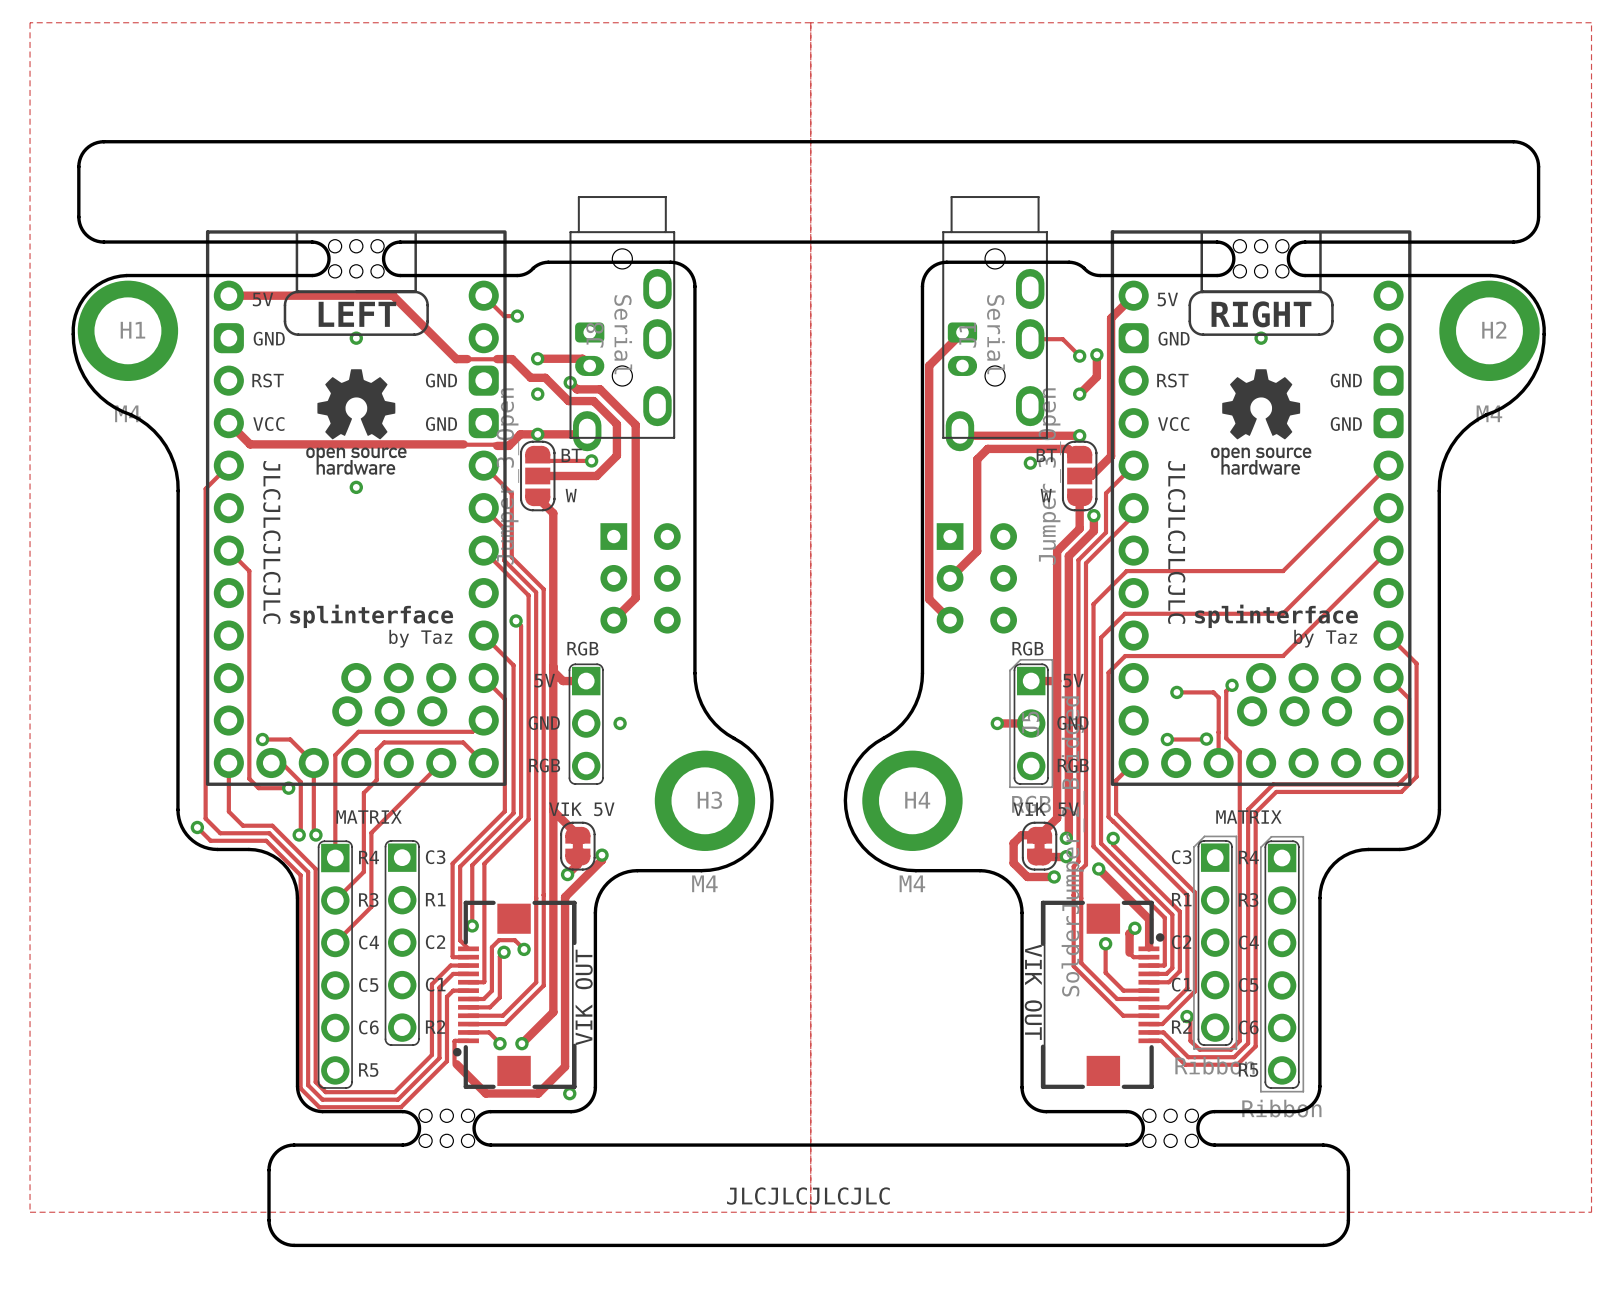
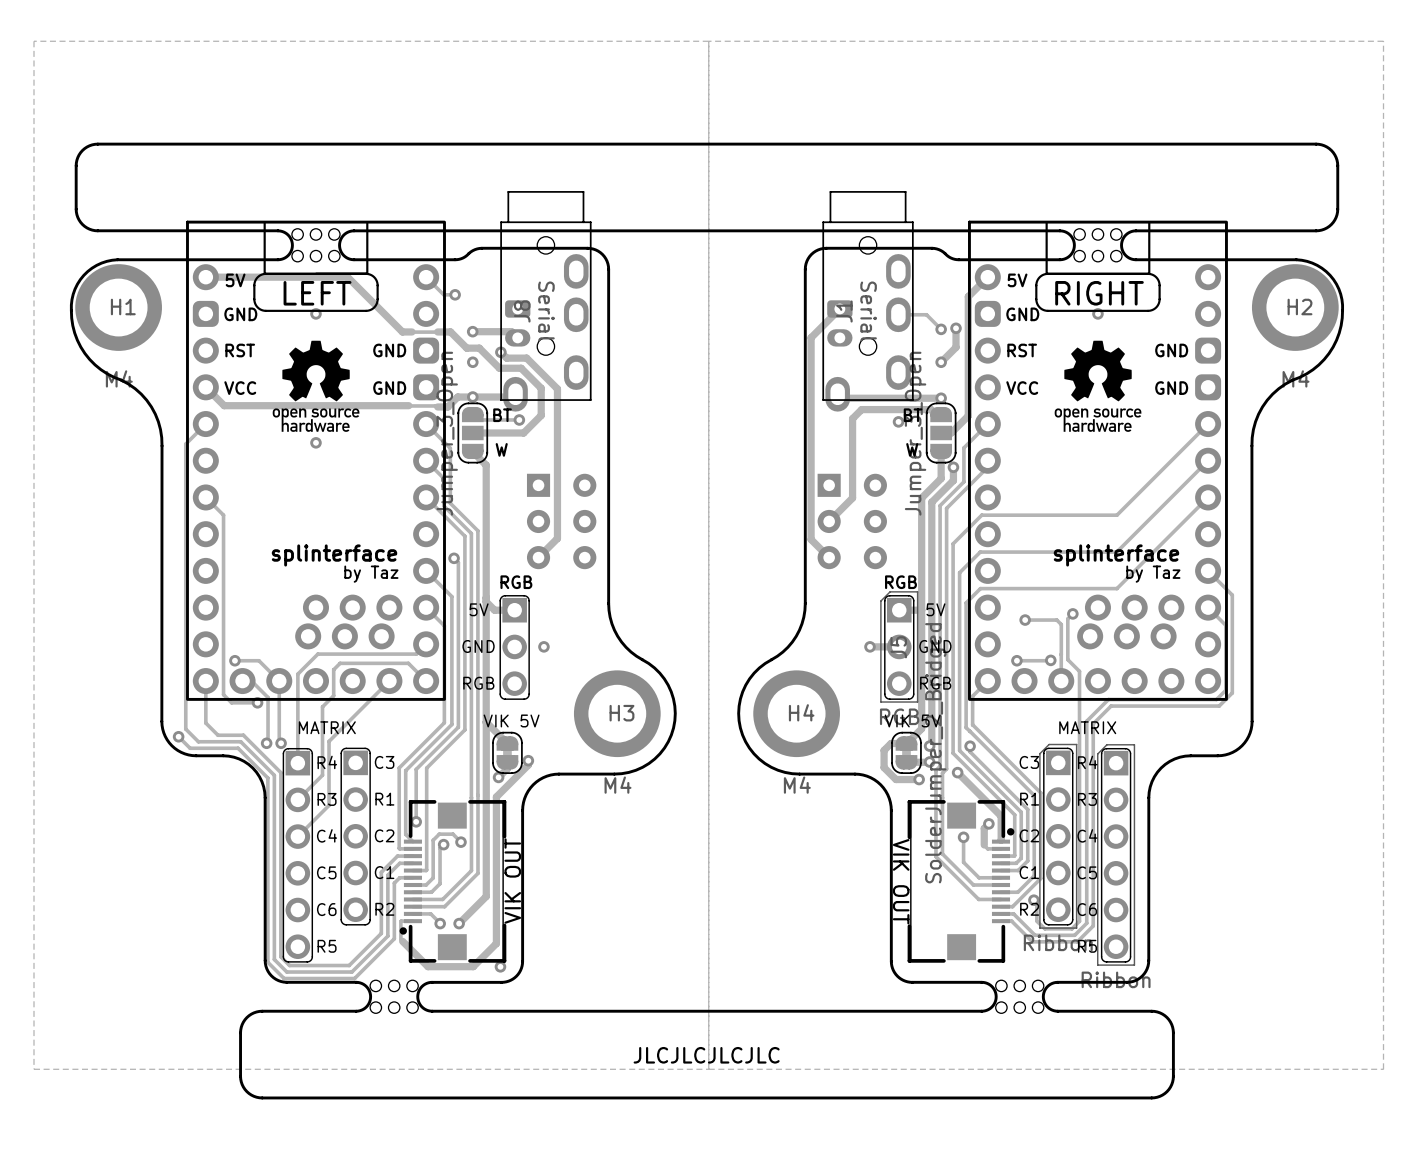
text: JLCJLCJLCJLC (271, 542) -> none
text: JLCJLCJLCJLC (1176, 542) -> none

